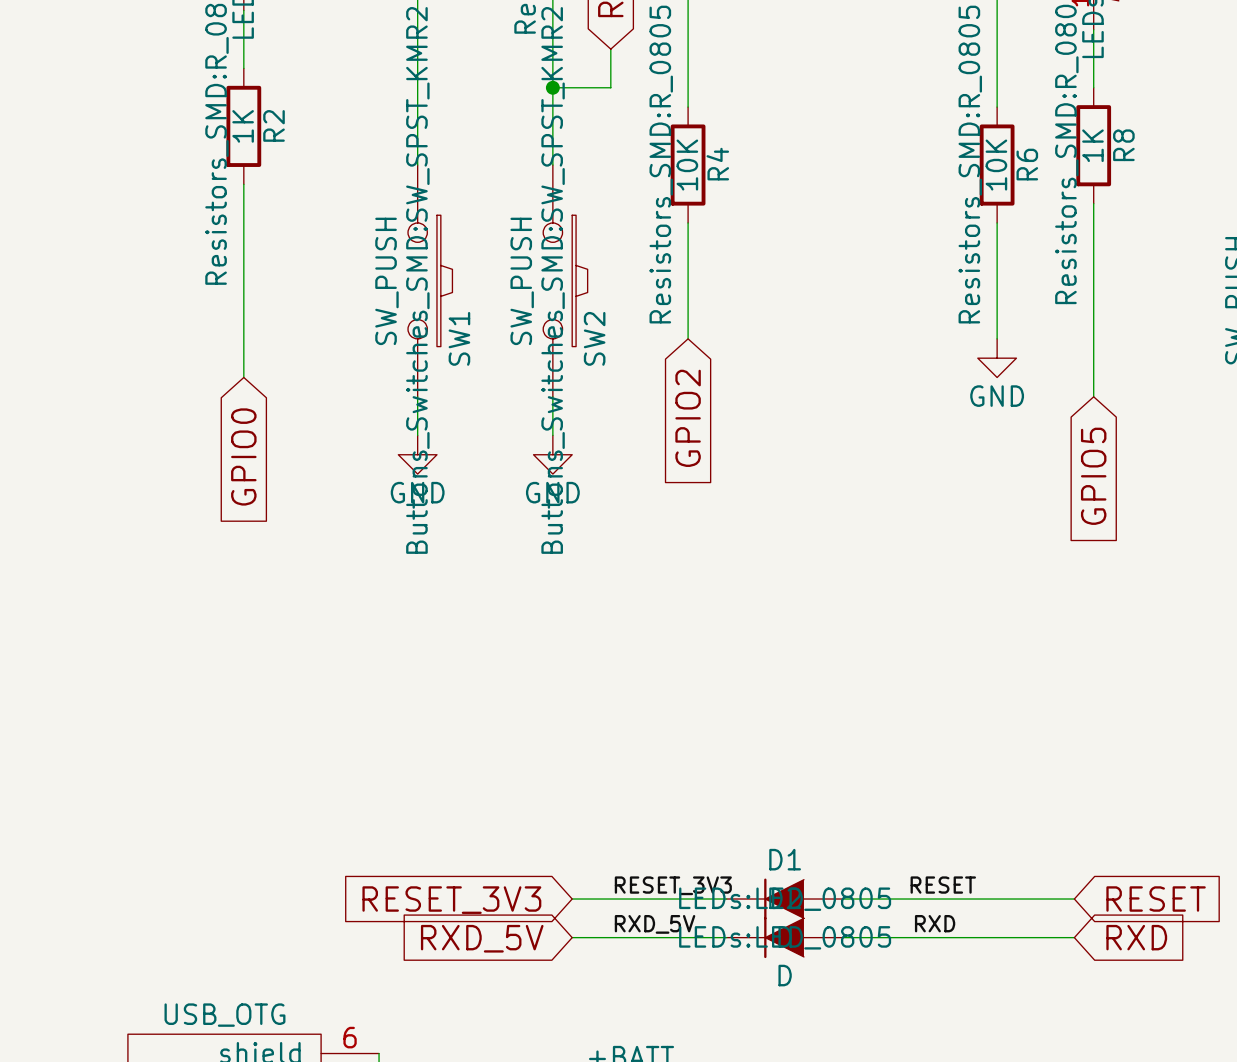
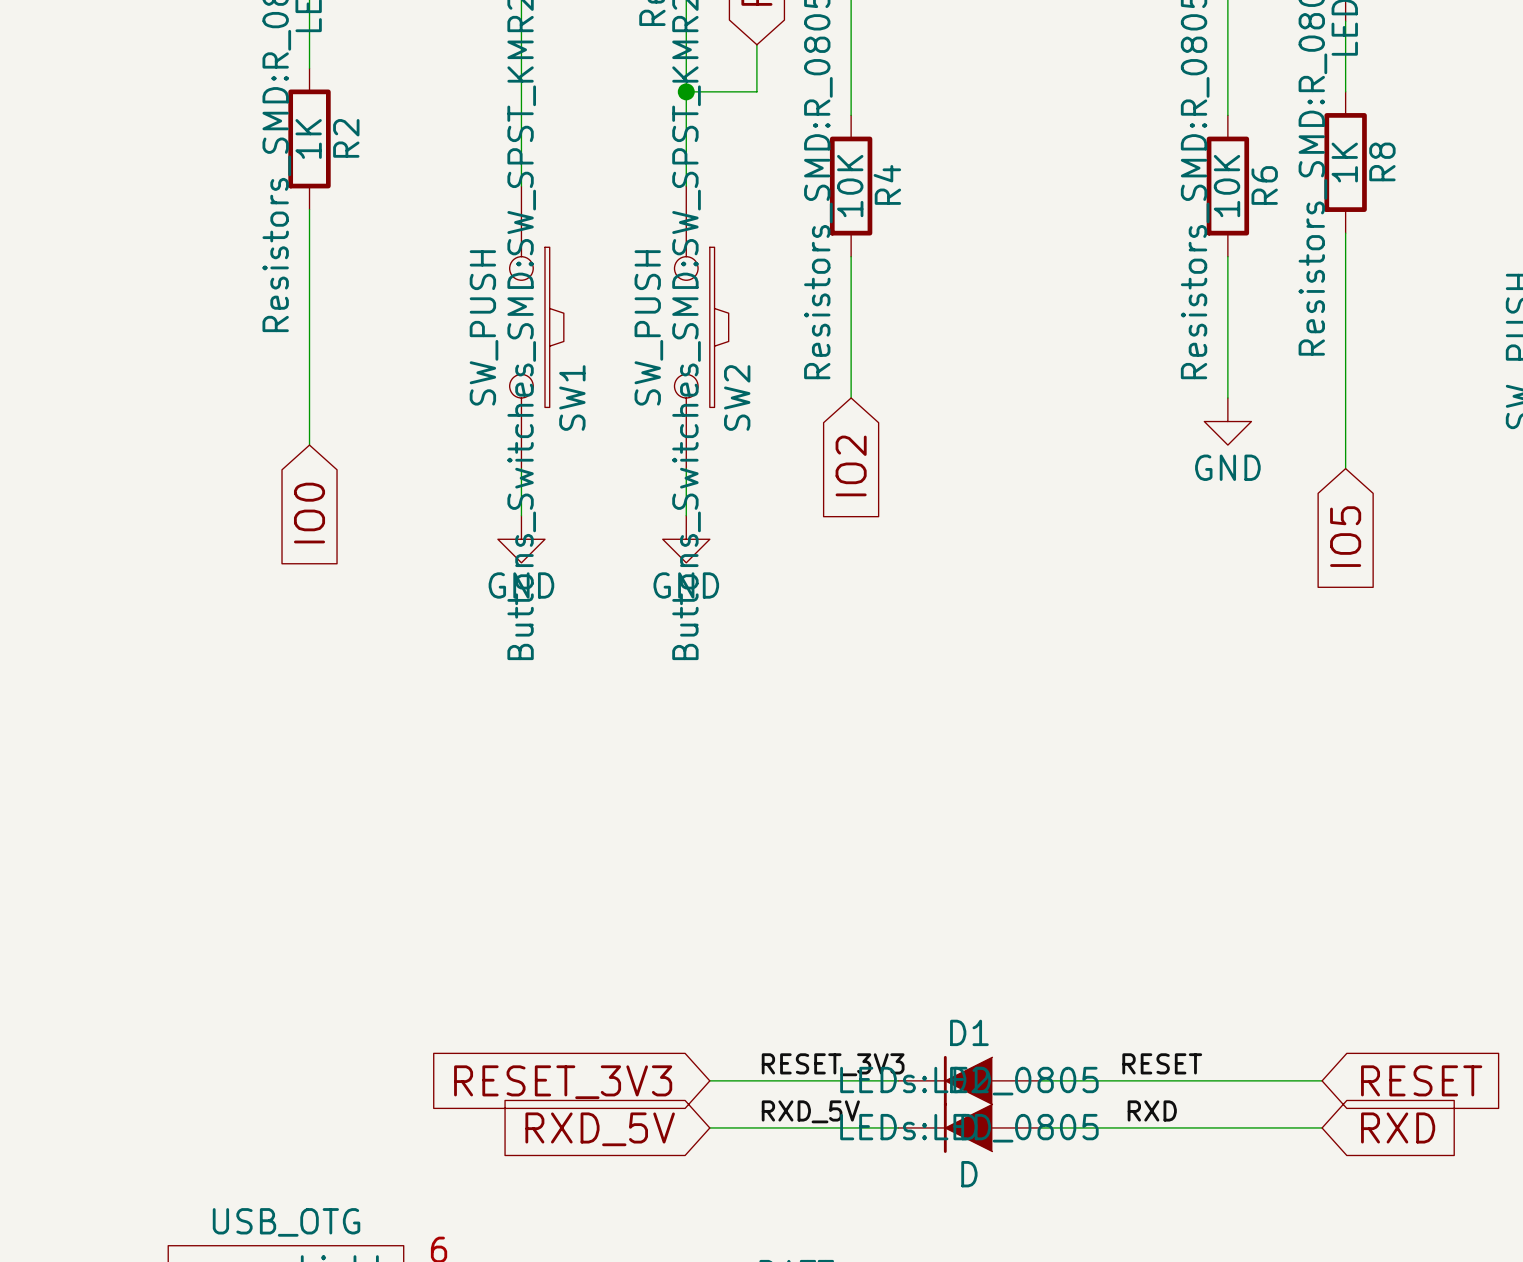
global label: GPIO2 (688, 418) -> IO2 (851, 465)
global label: GPIO0 (243, 456) -> IO0 (309, 513)
global label: GPIO5 (1093, 476) -> IO5 (1345, 536)

